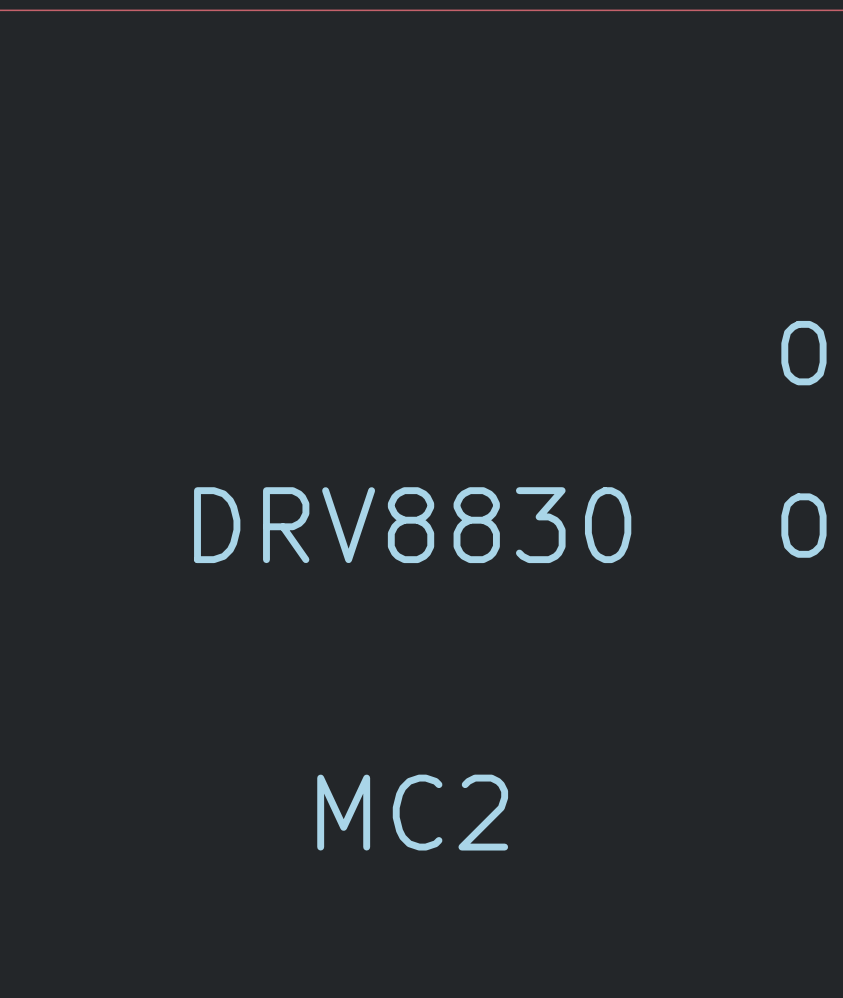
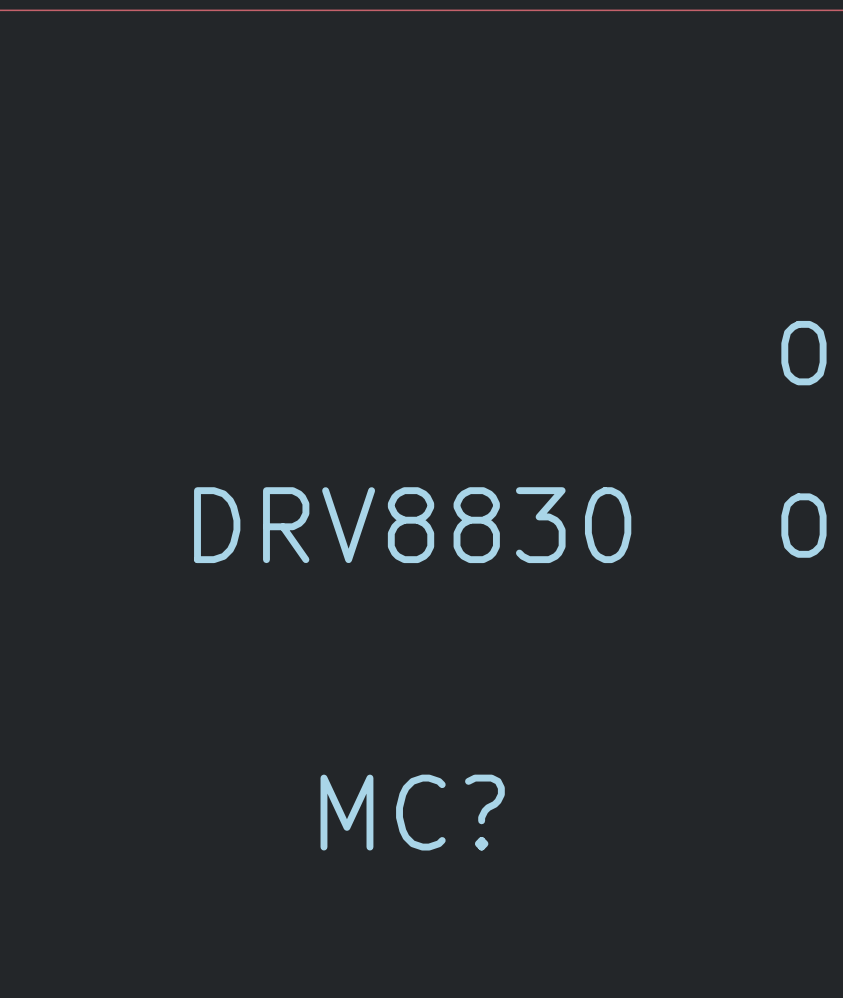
MC2 name: MC2 (412, 812) -> MC? (412, 812)

